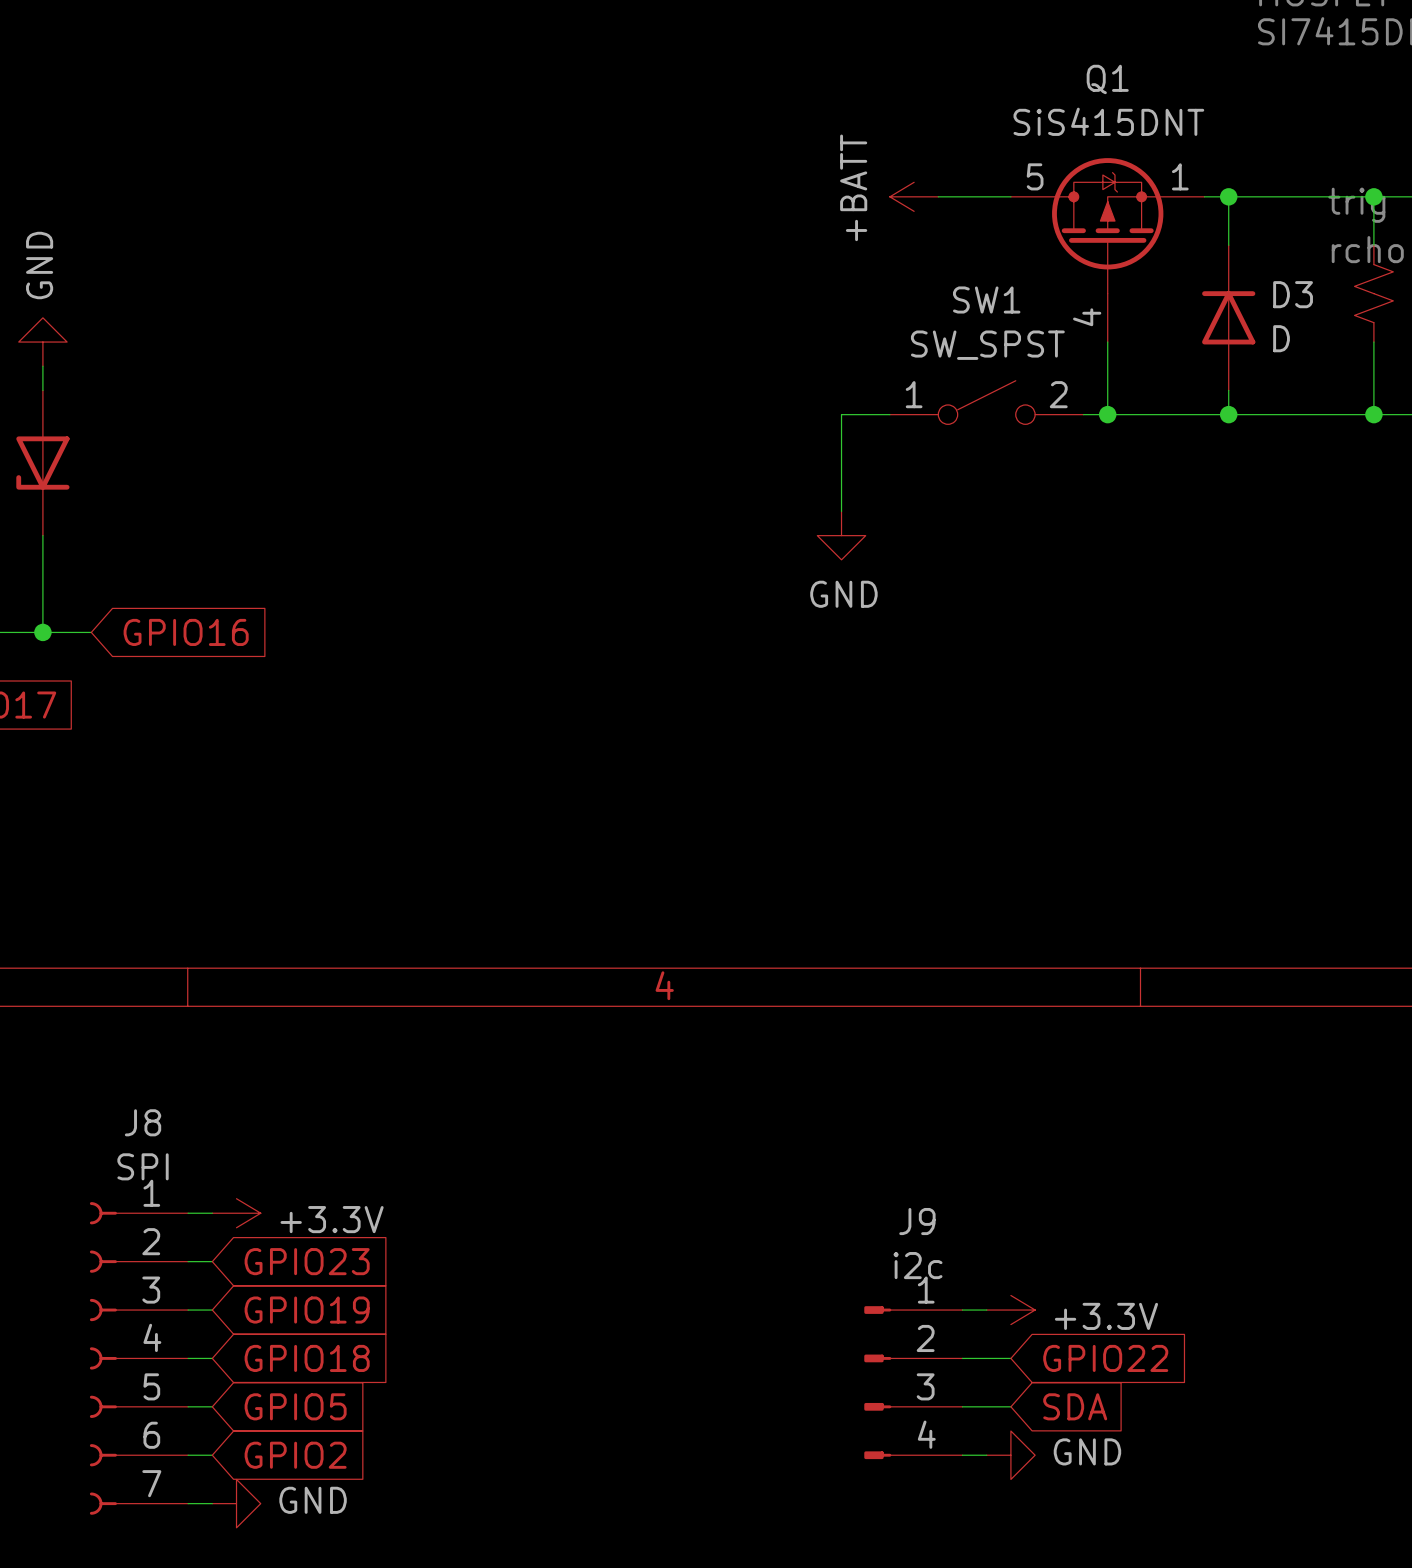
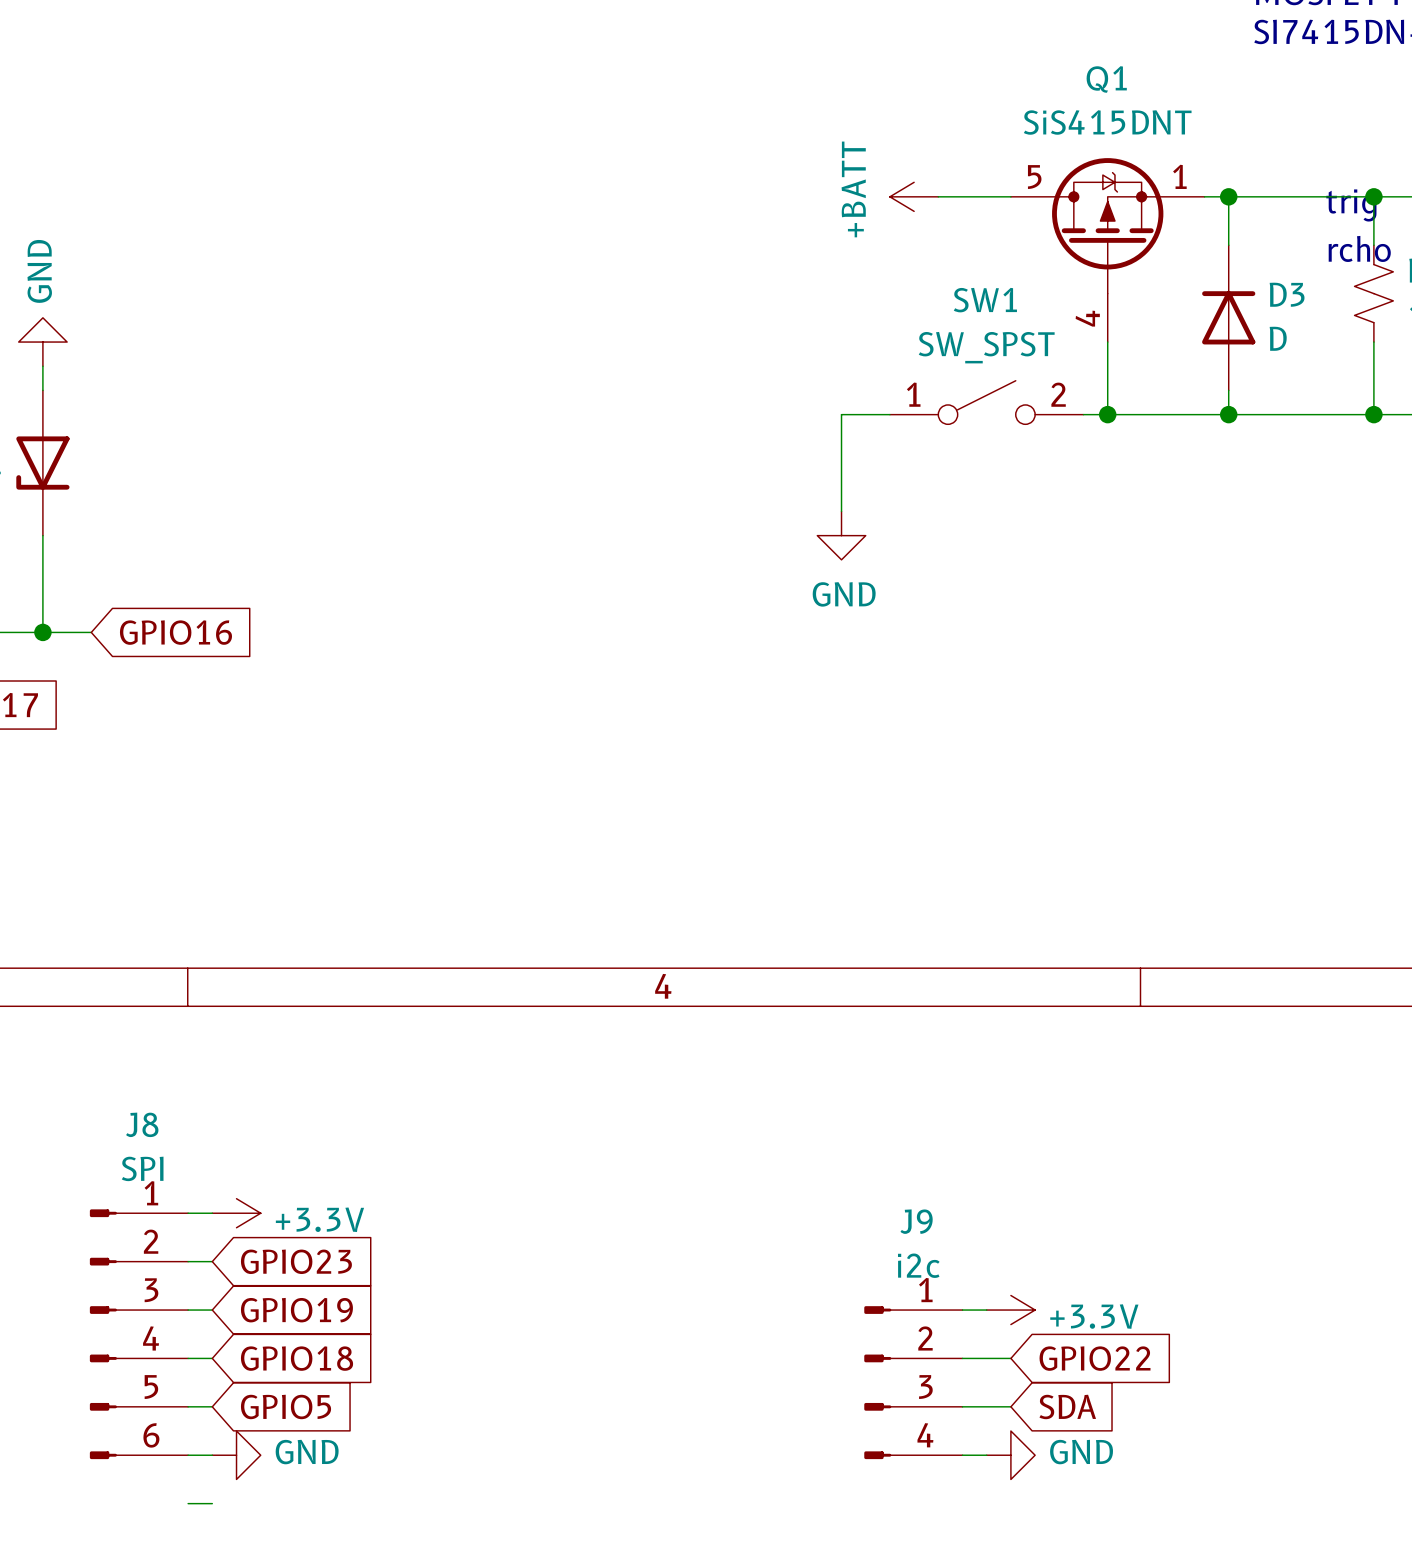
J8 symbol: [89, 1202, 189, 1515] -> [89, 1209, 189, 1460]
global label: GPIO2 (295, 1455) -> none
power symbol position: GND (236, 1503) -> GND (236, 1455)

